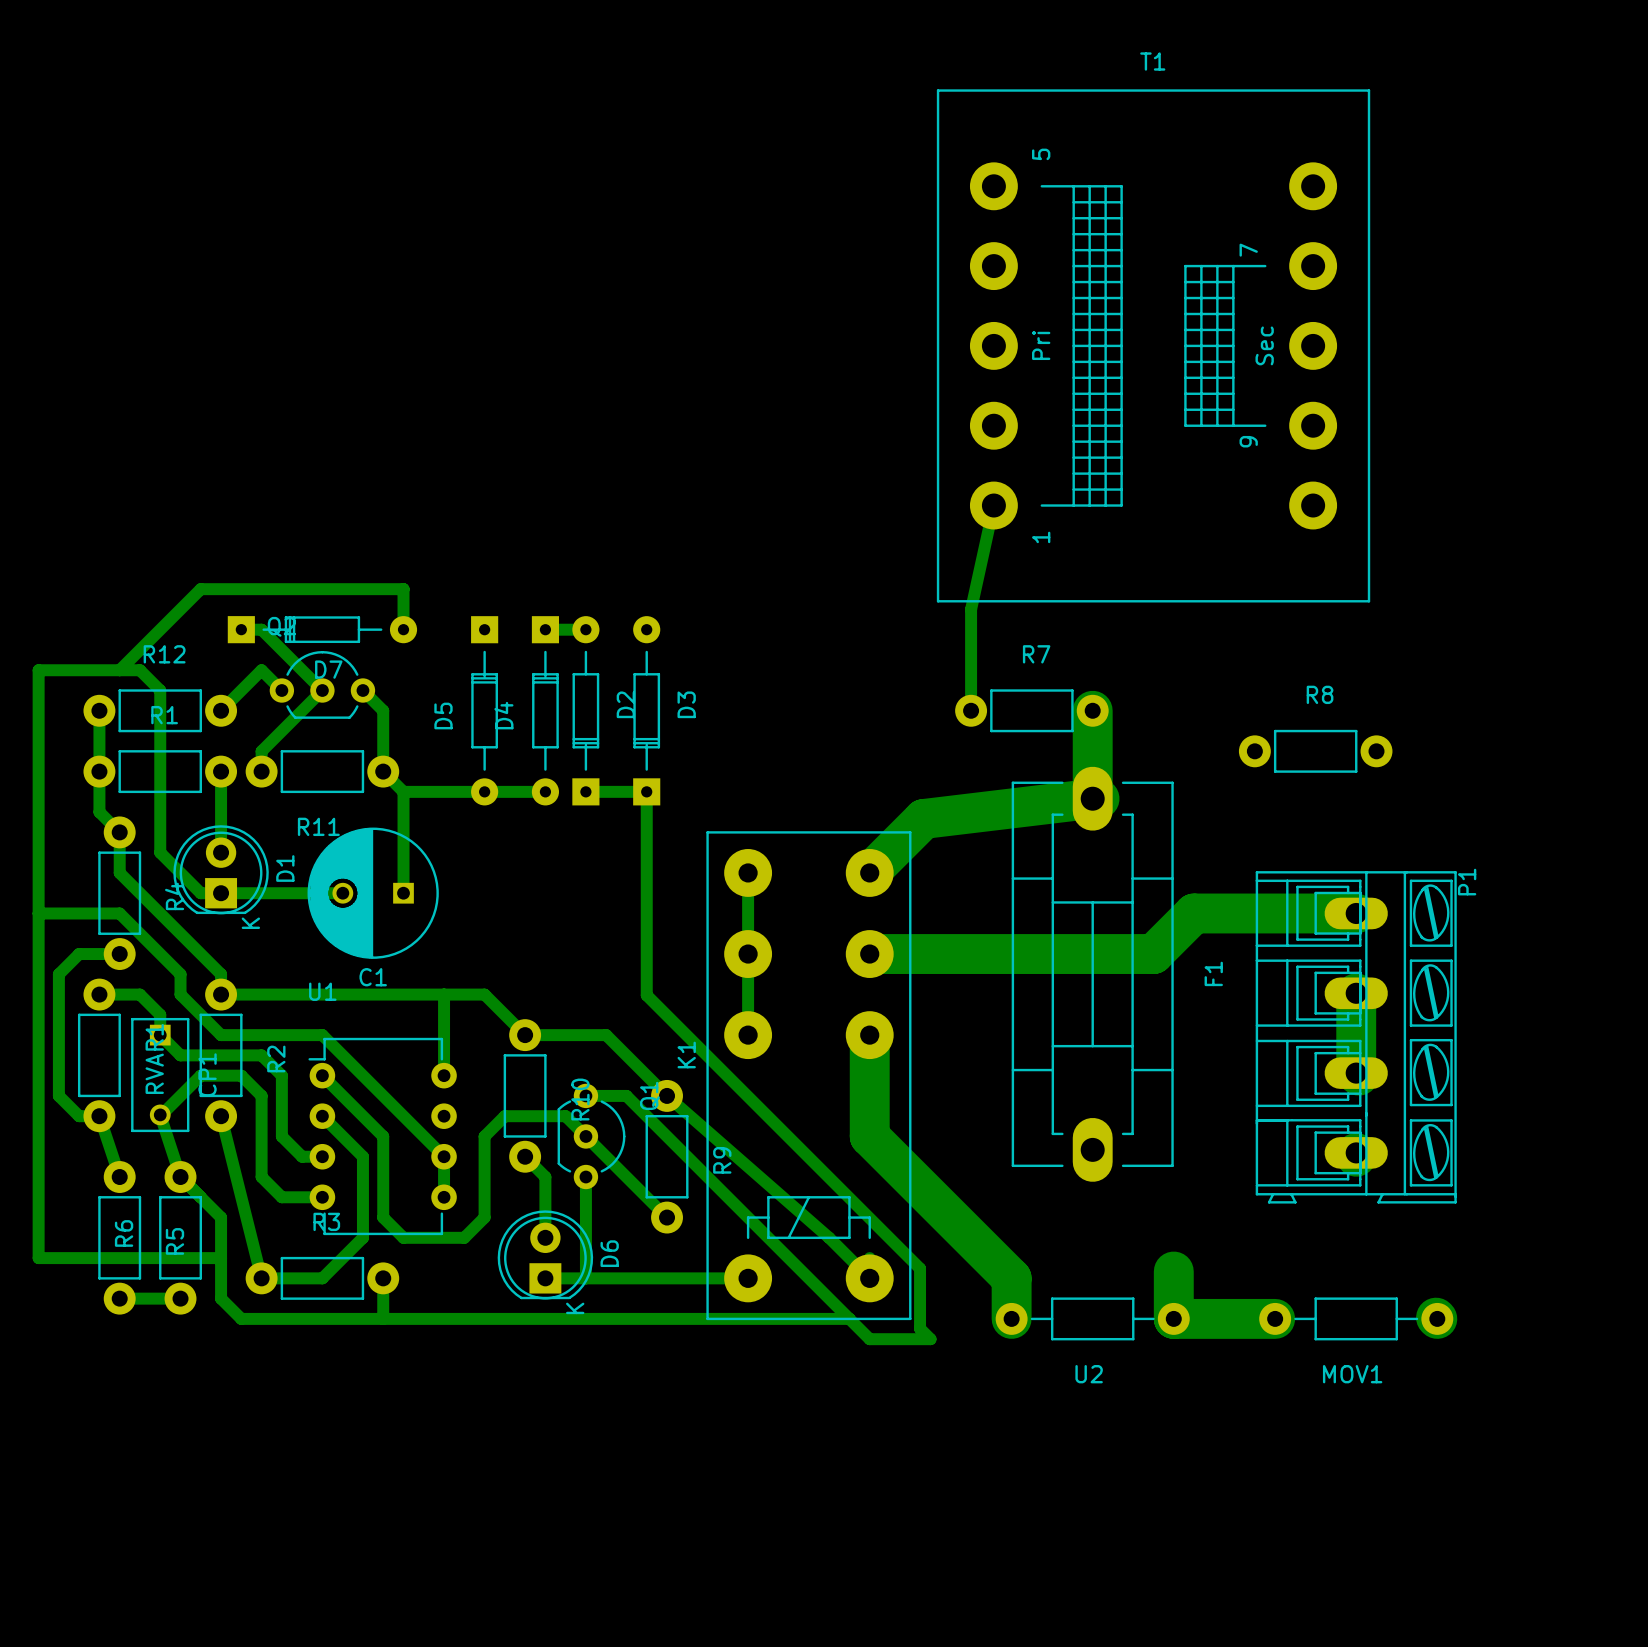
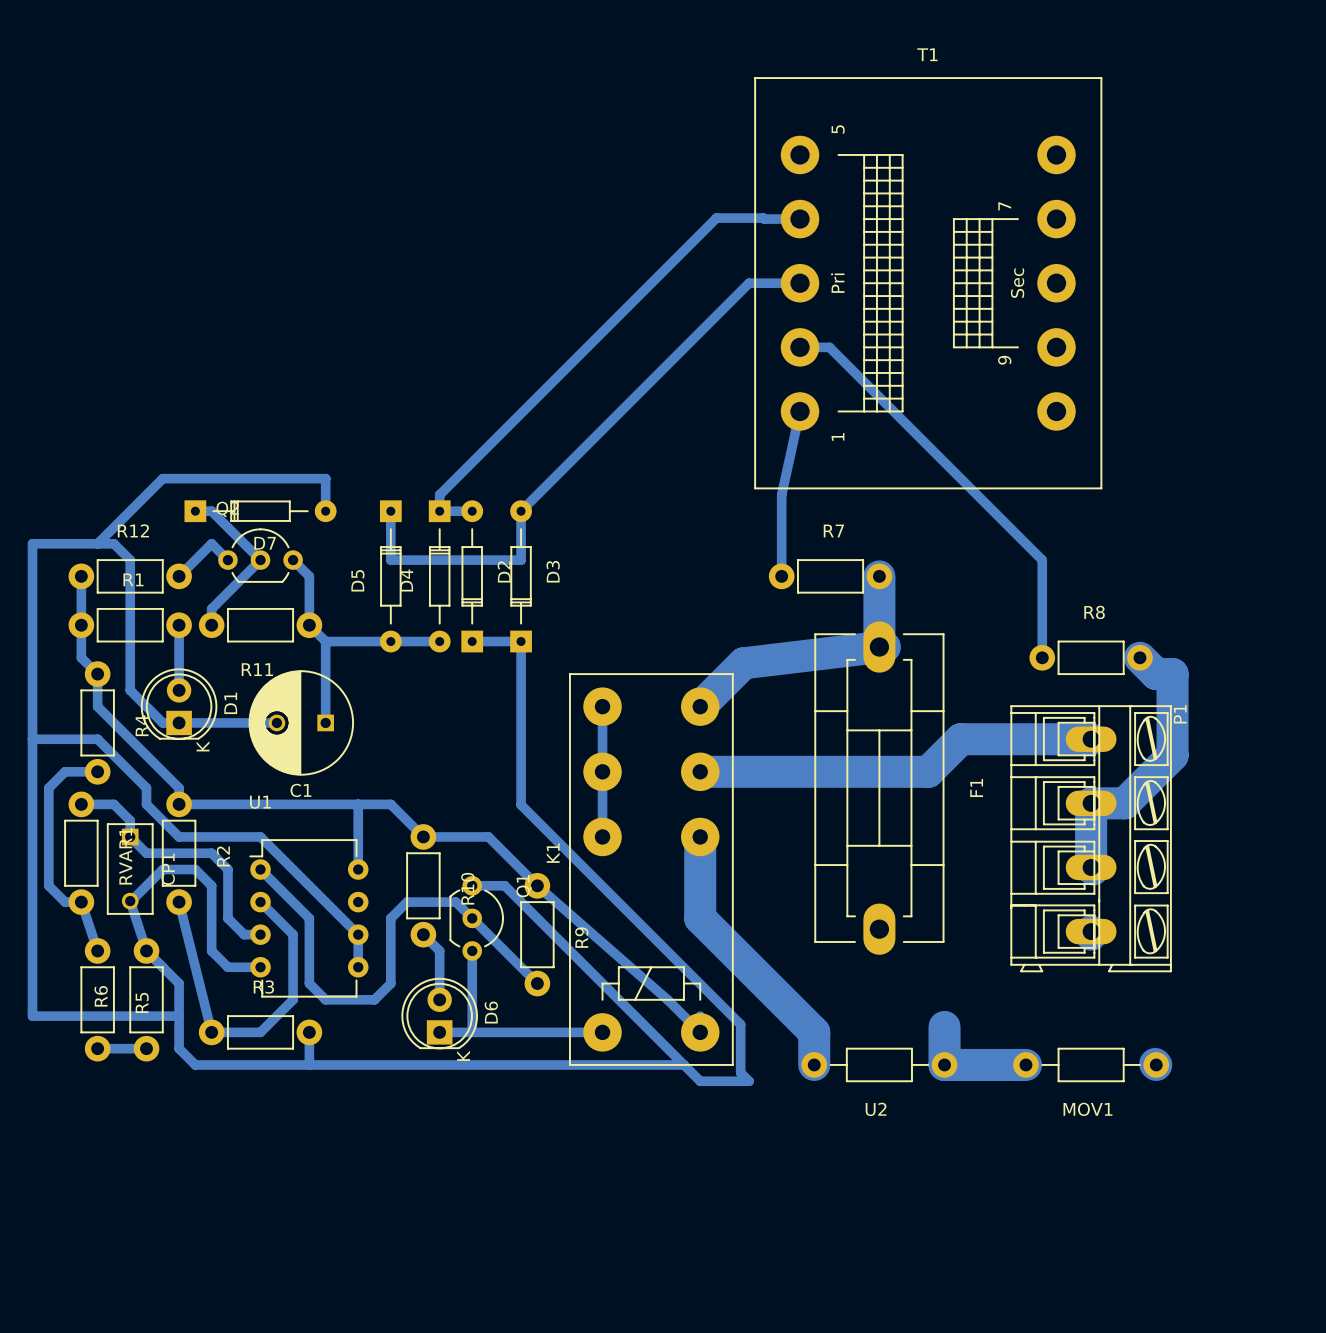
bottom track: none -> (800, 219) (716, 218) (439, 494) (439, 511)
bottom track: none -> (800, 283) (749, 283) (521, 511) (521, 560)
bottom track: none -> (800, 347) (829, 347) (1042, 560) (1042, 657)
bottom track: none -> (390, 511) (390, 560) (521, 560)
R8 position: (1315, 751) -> (1091, 657)
bottom track: none -> (1139, 657) (1156, 674) (1172, 674) (1172, 755) (1124, 803) (1091, 803)

